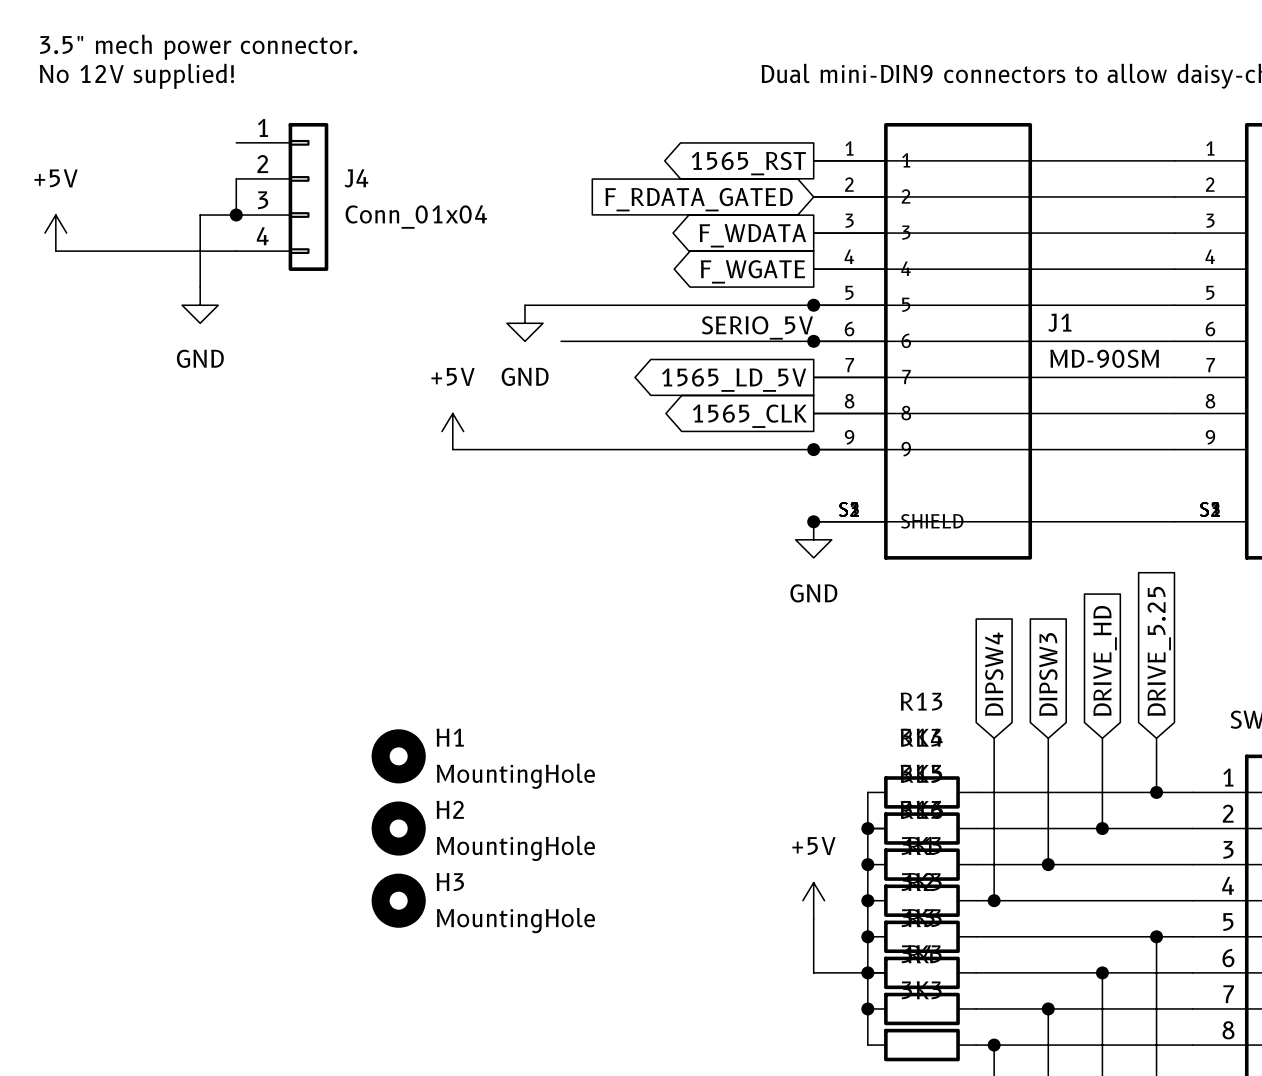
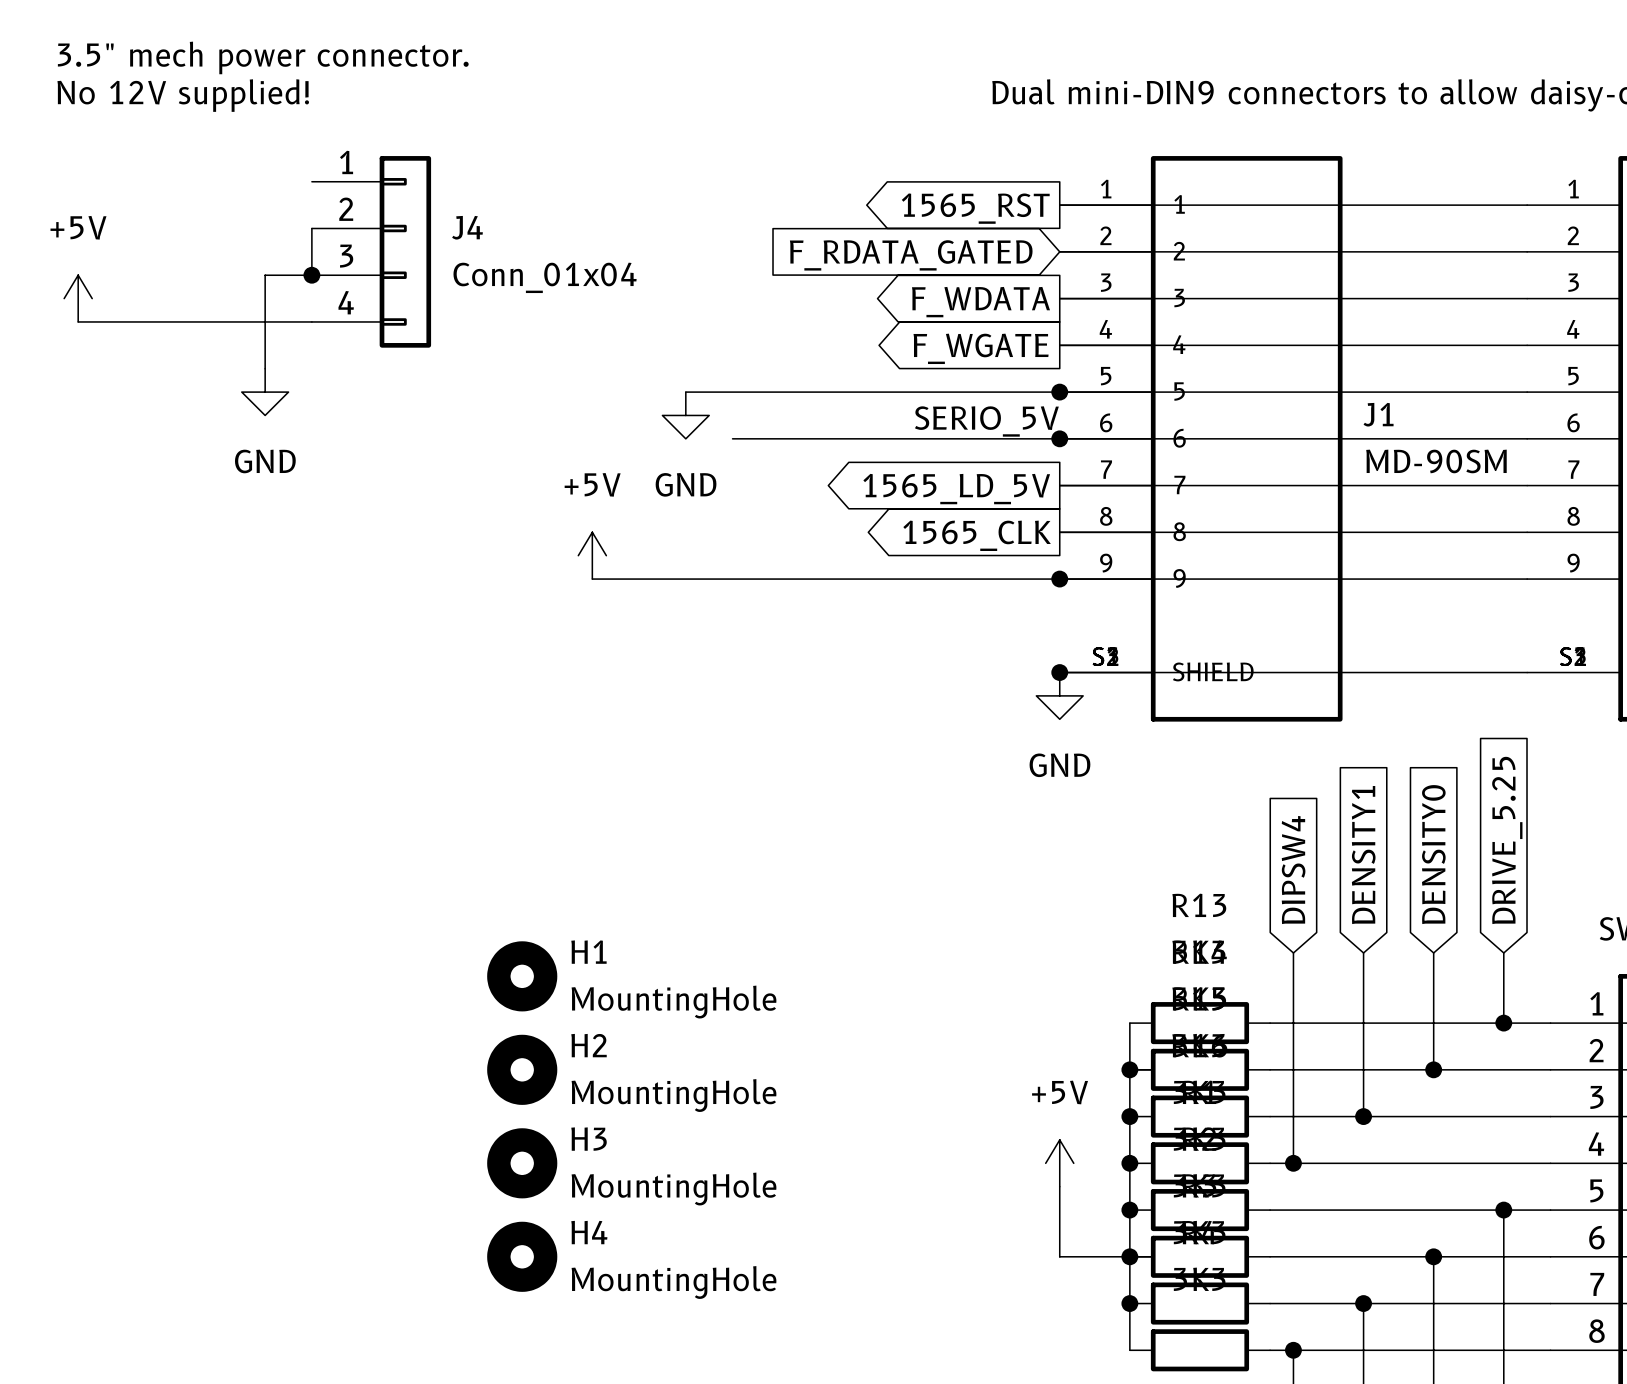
global label: DRIVE_HD (1105, 660) -> DENSITY0 (1433, 854)
global label: DIPSW3 (1048, 674) -> DENSITY1 (1363, 855)
H4: none -> MountingHole (522, 1256)

